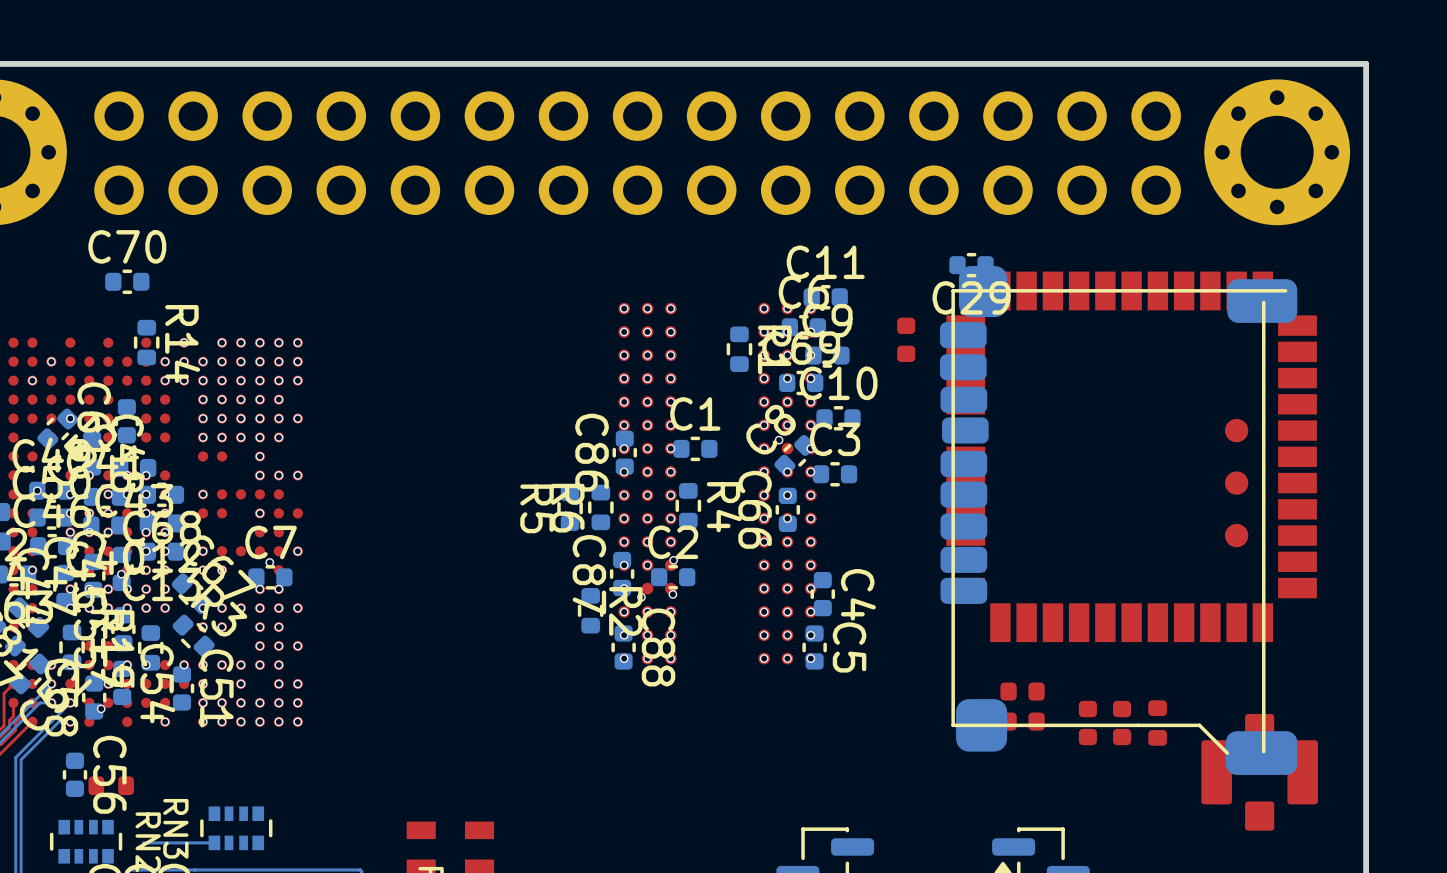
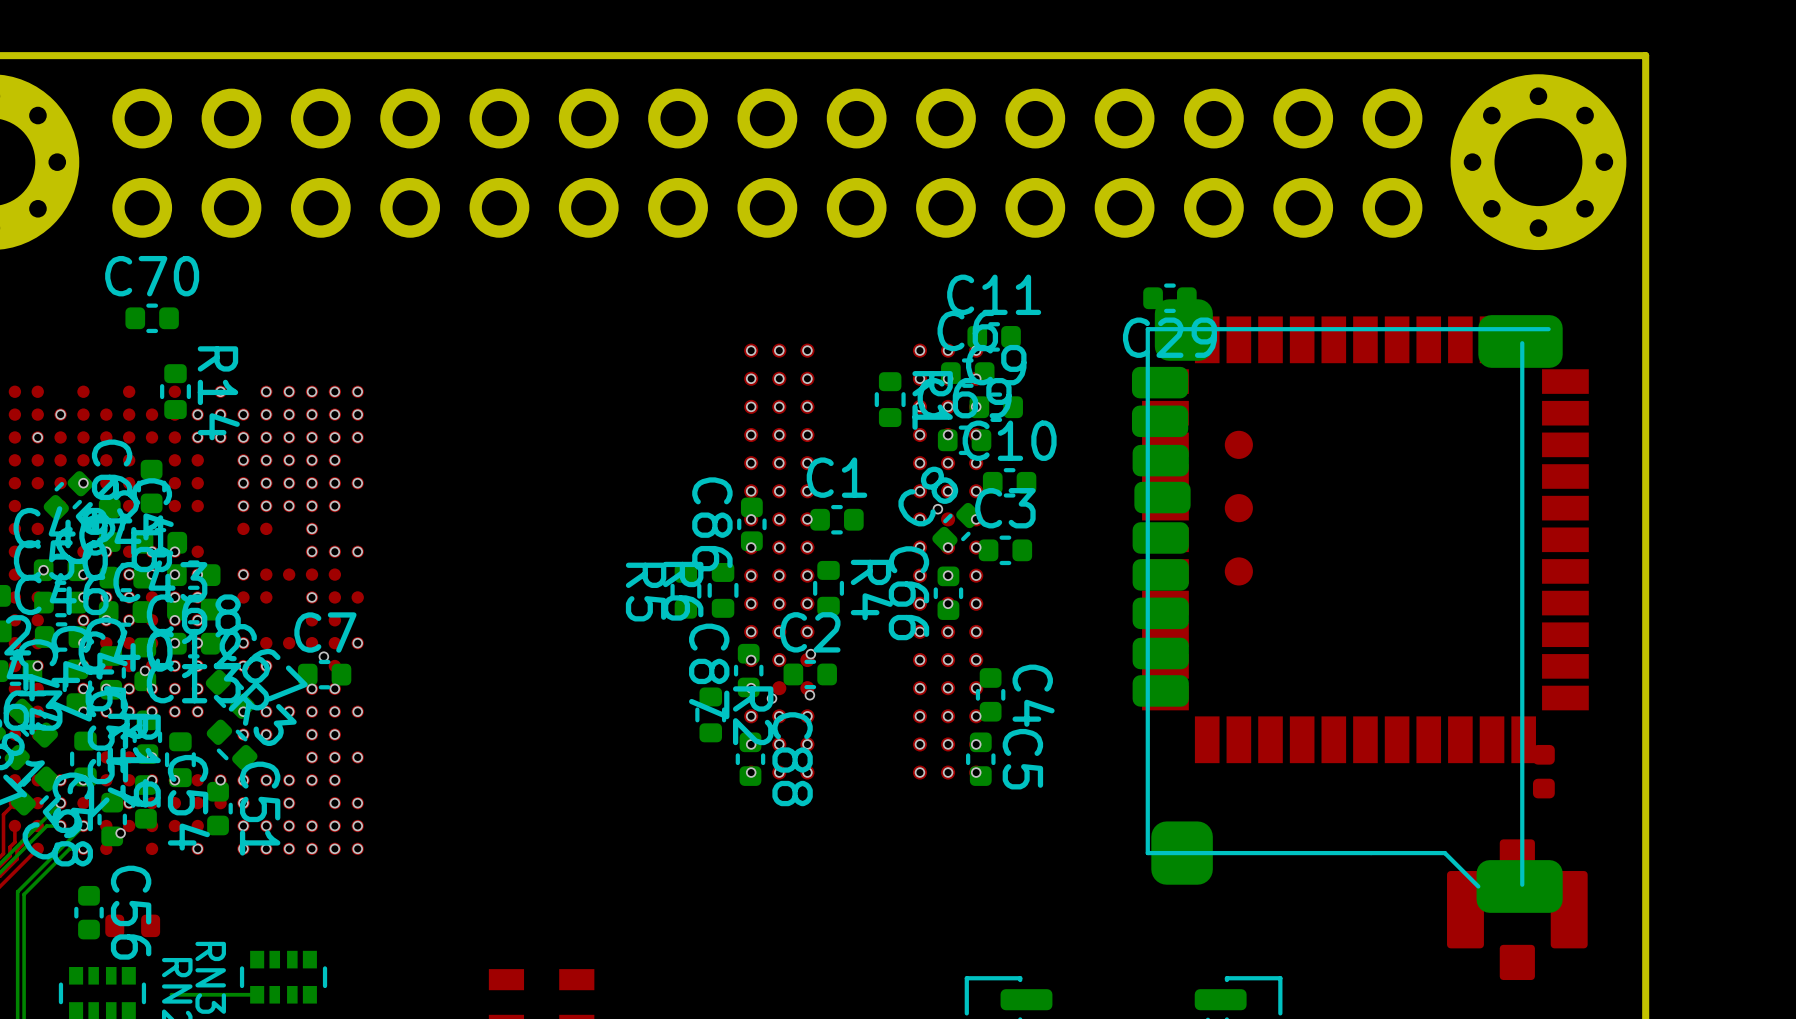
part: (906, 339) -> none
part rotation: 0° (1131, 456) -> 180° (1365, 539)
part: none -> (1543, 771)
part: (1022, 691) -> none
part: (1022, 721) -> none
part: (1087, 723) -> none
part: (1122, 723) -> none
part: (1157, 723) -> none

